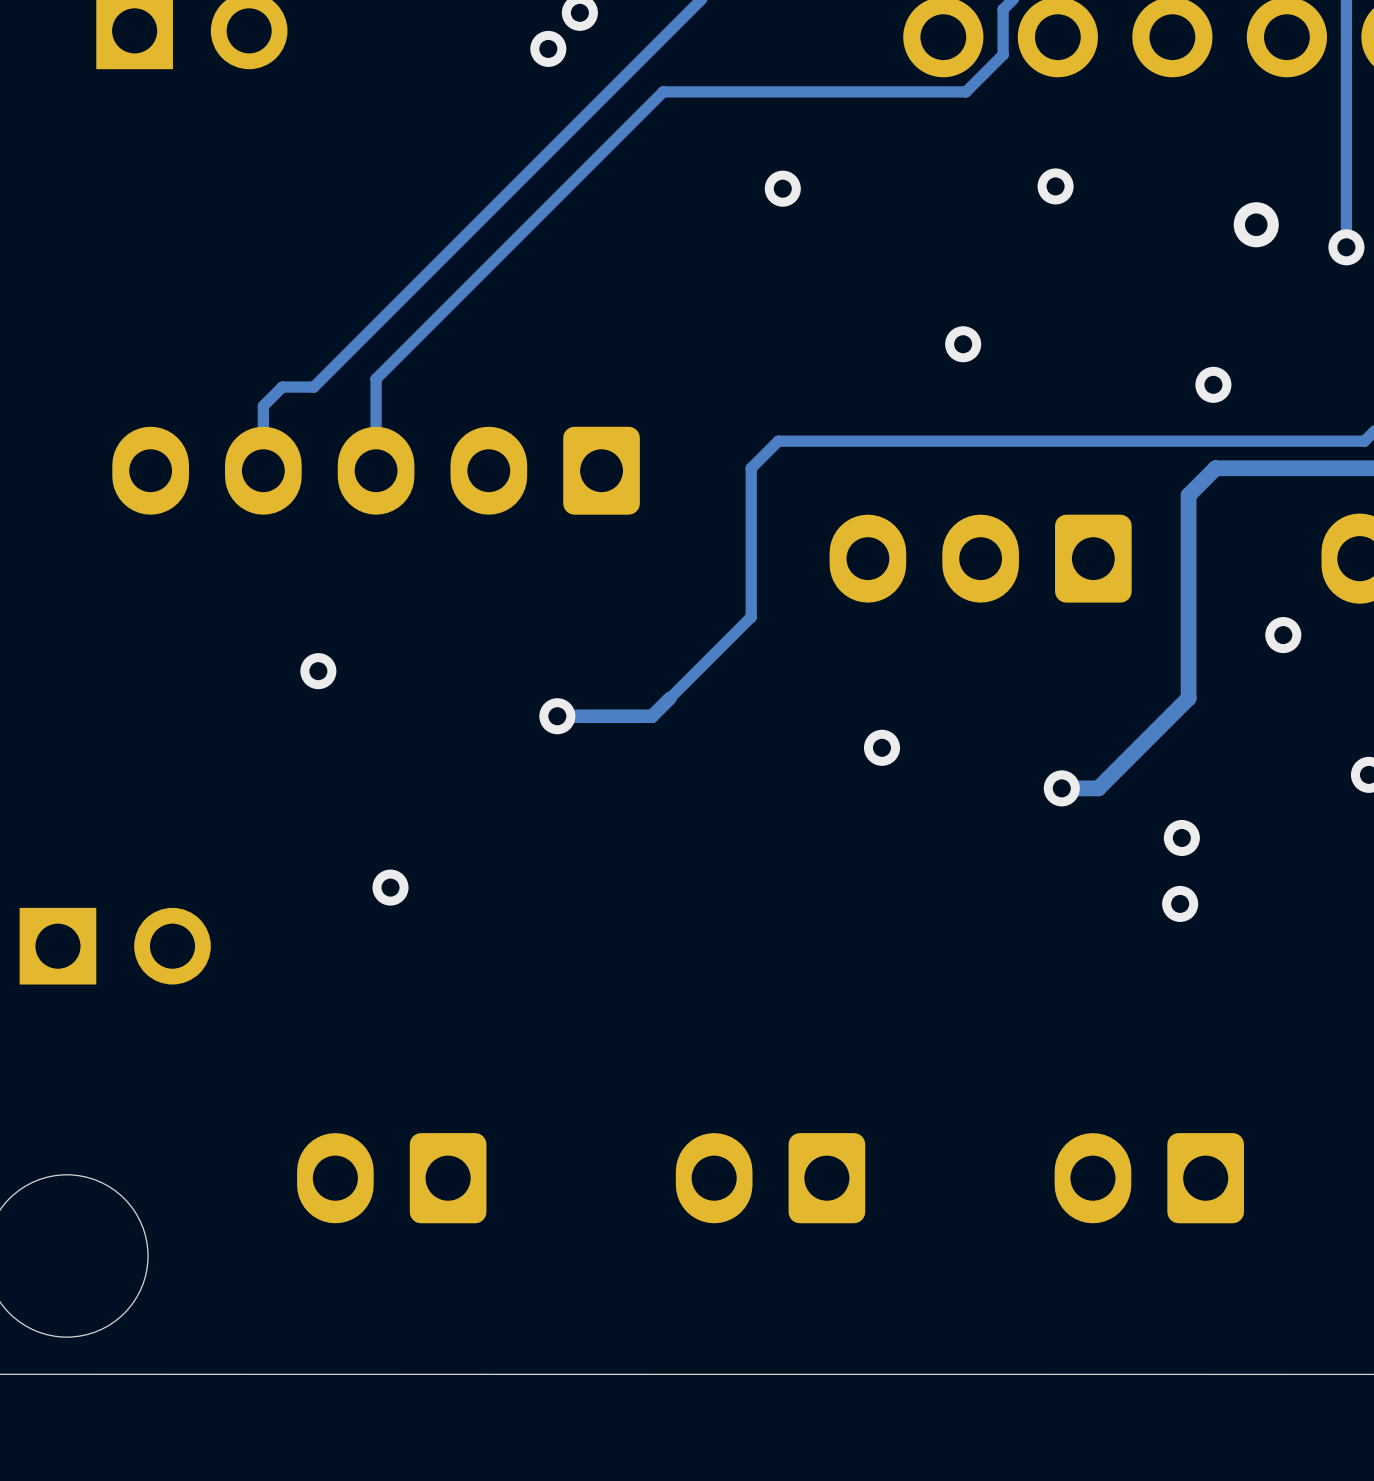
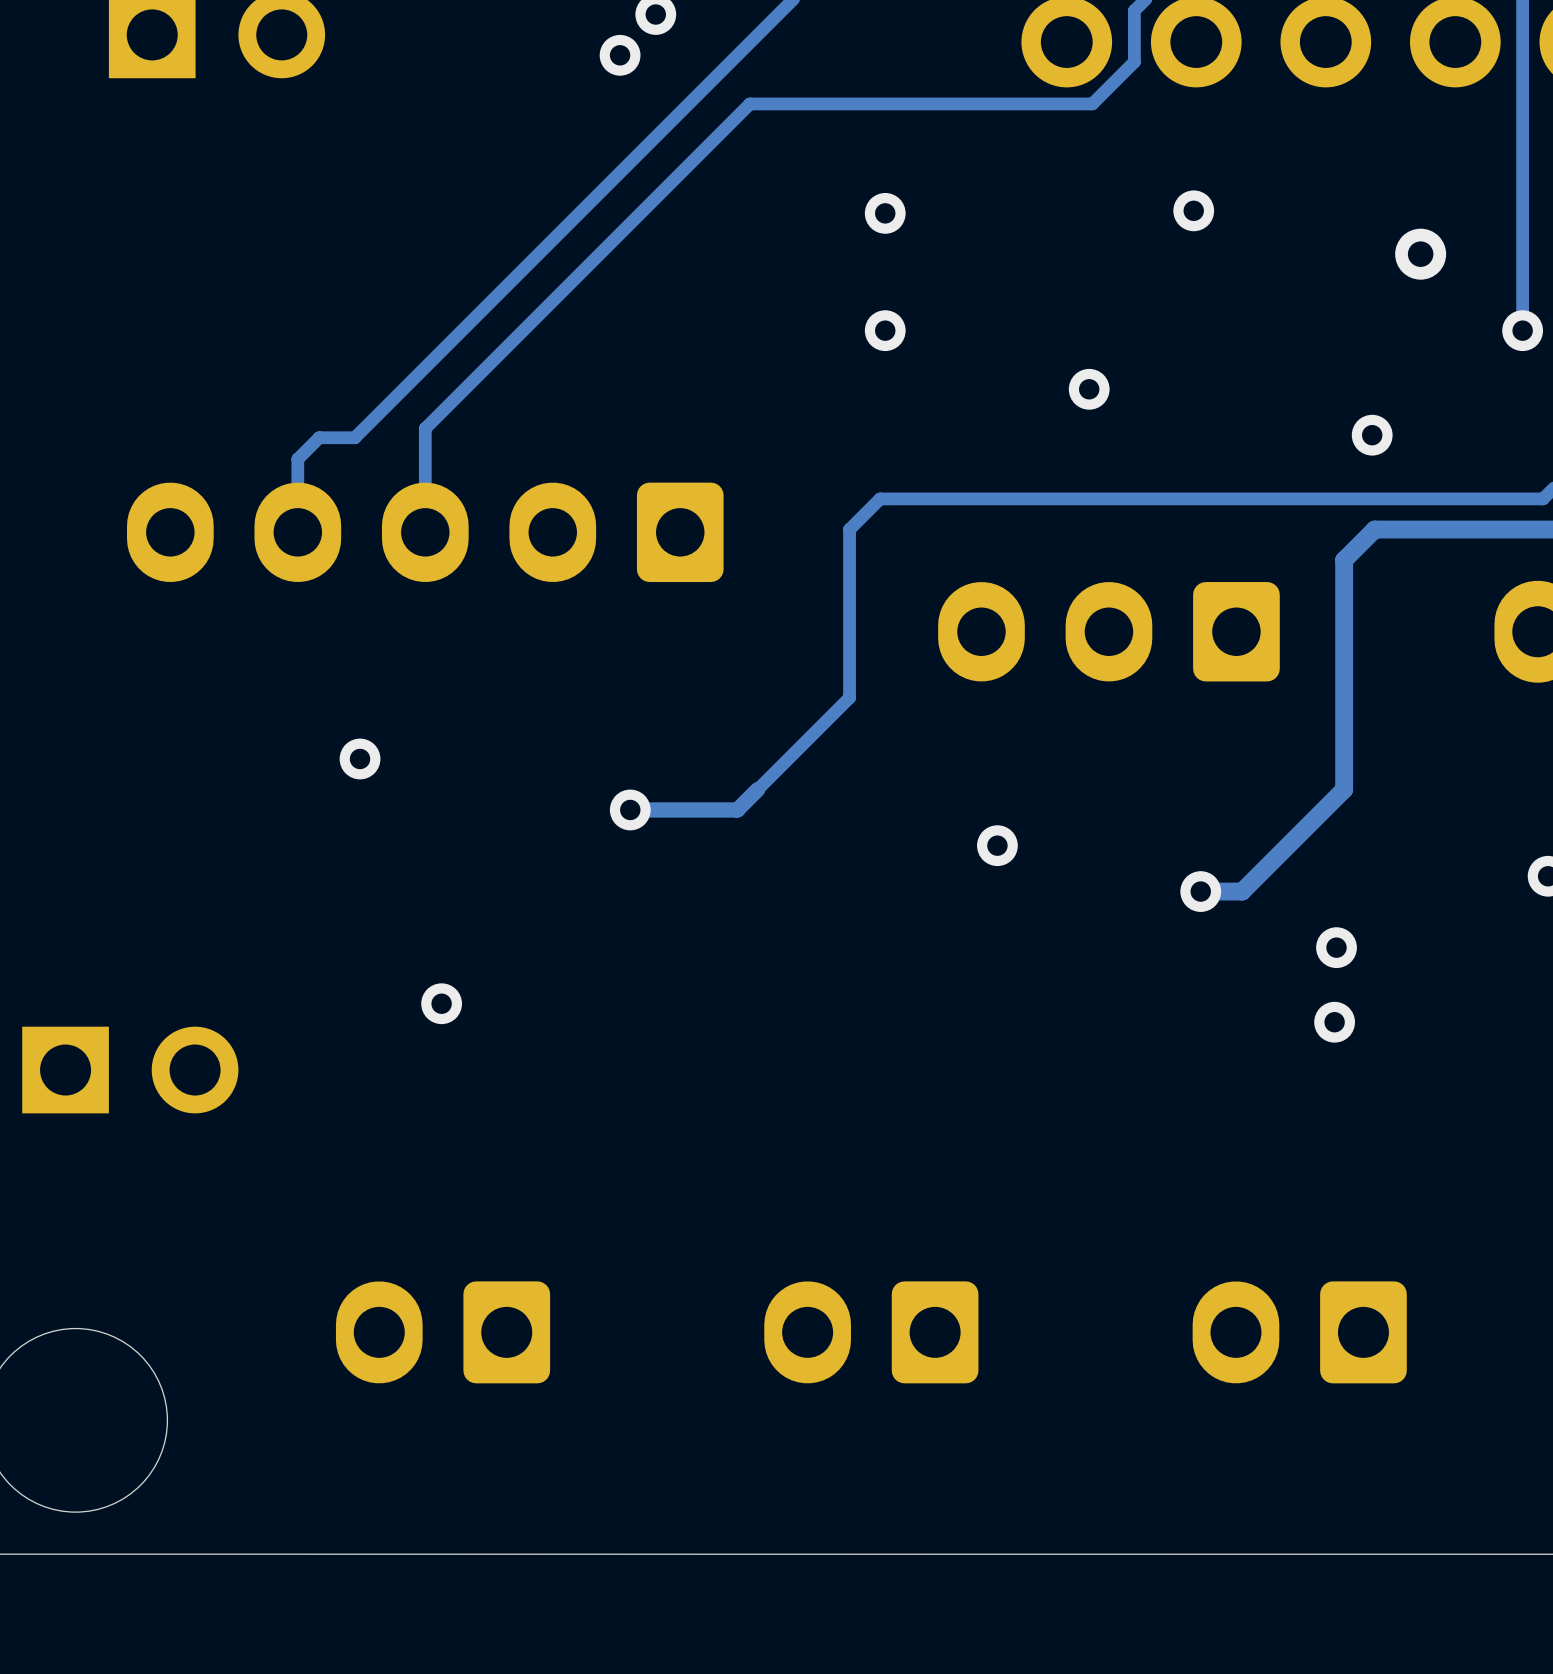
track: none -> (1522, 279) (1522, 330)
via position: (1346, 247) -> (1522, 330)
via: none -> (885, 330)
via: (1283, 635) -> none

